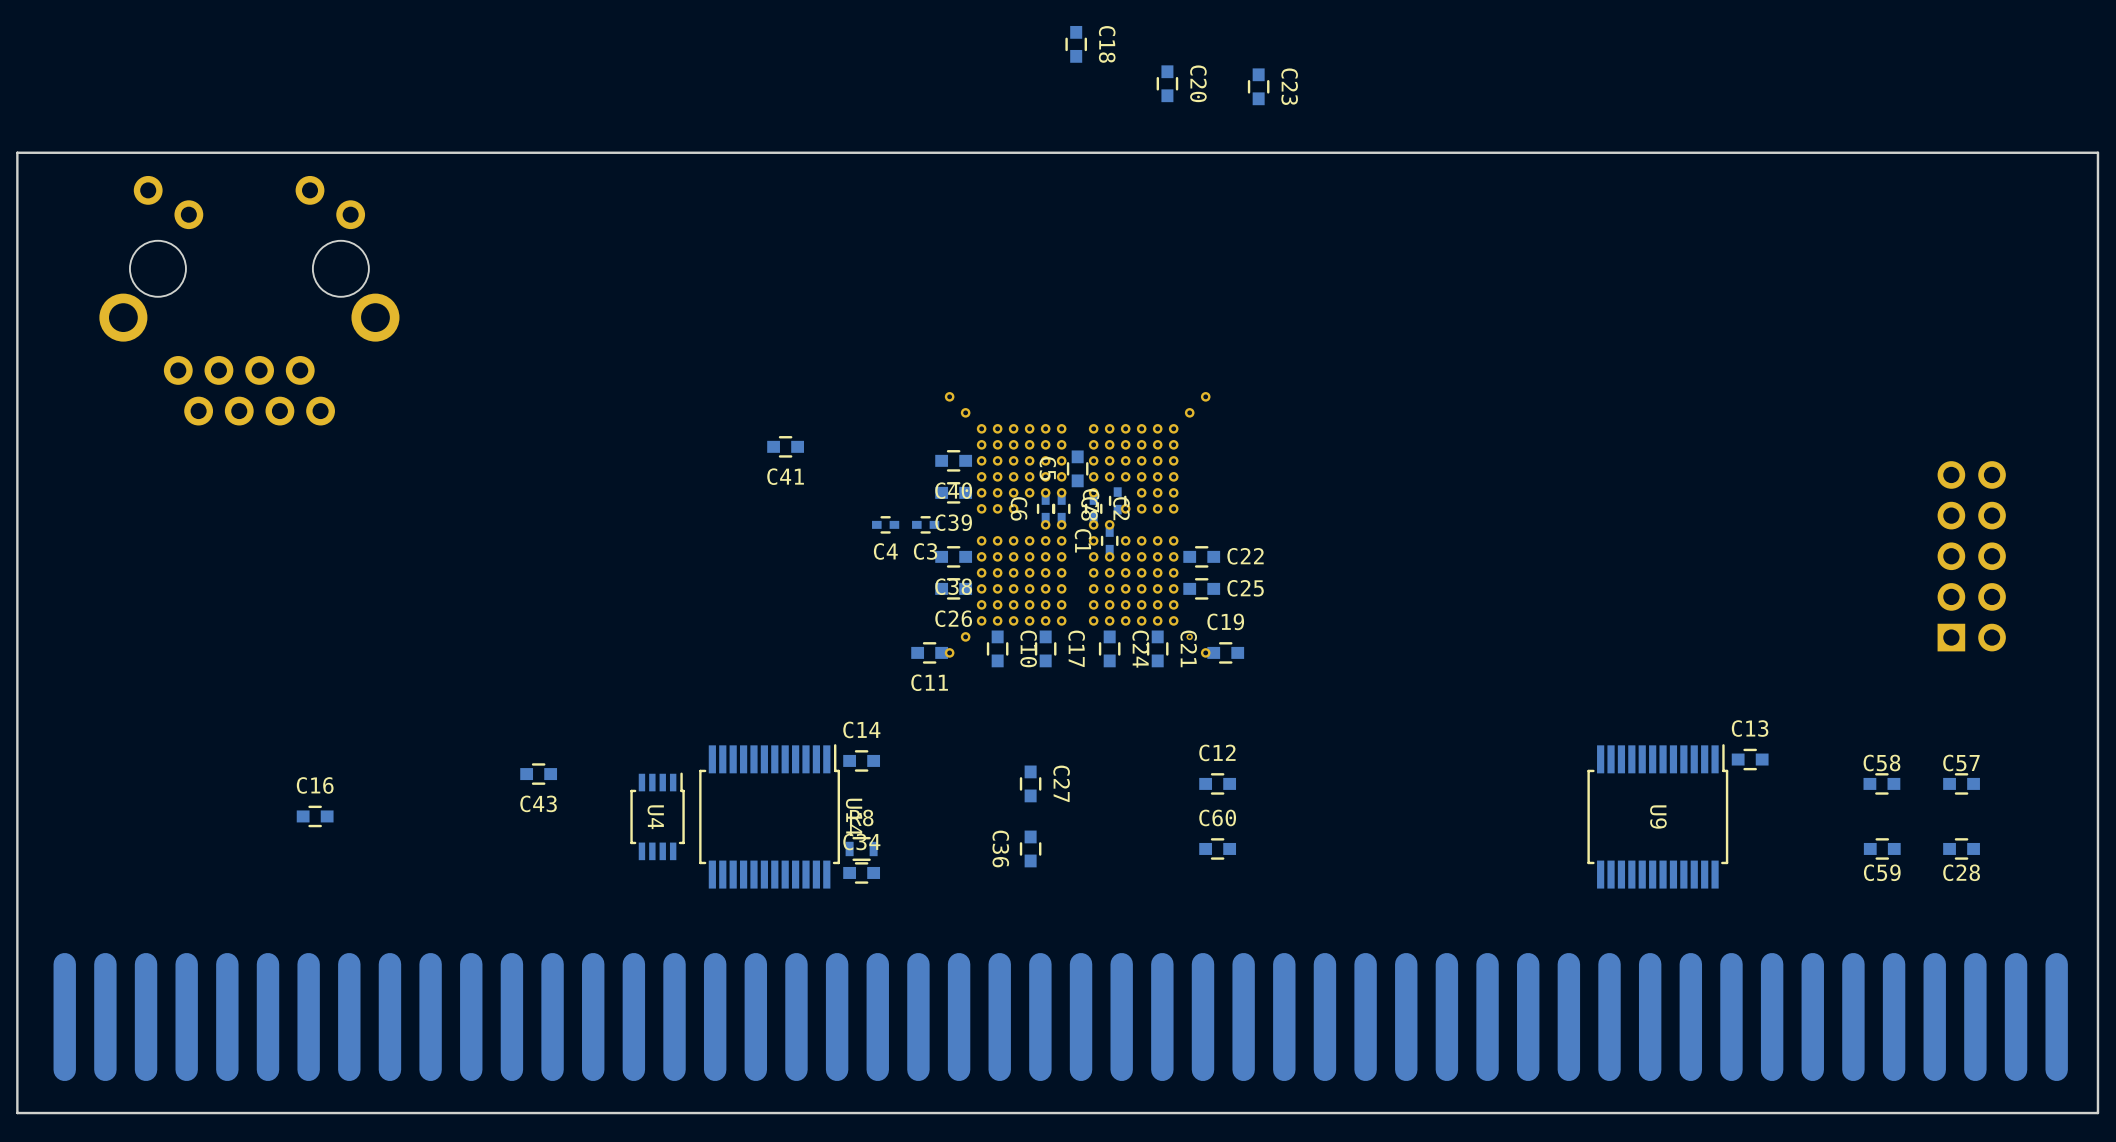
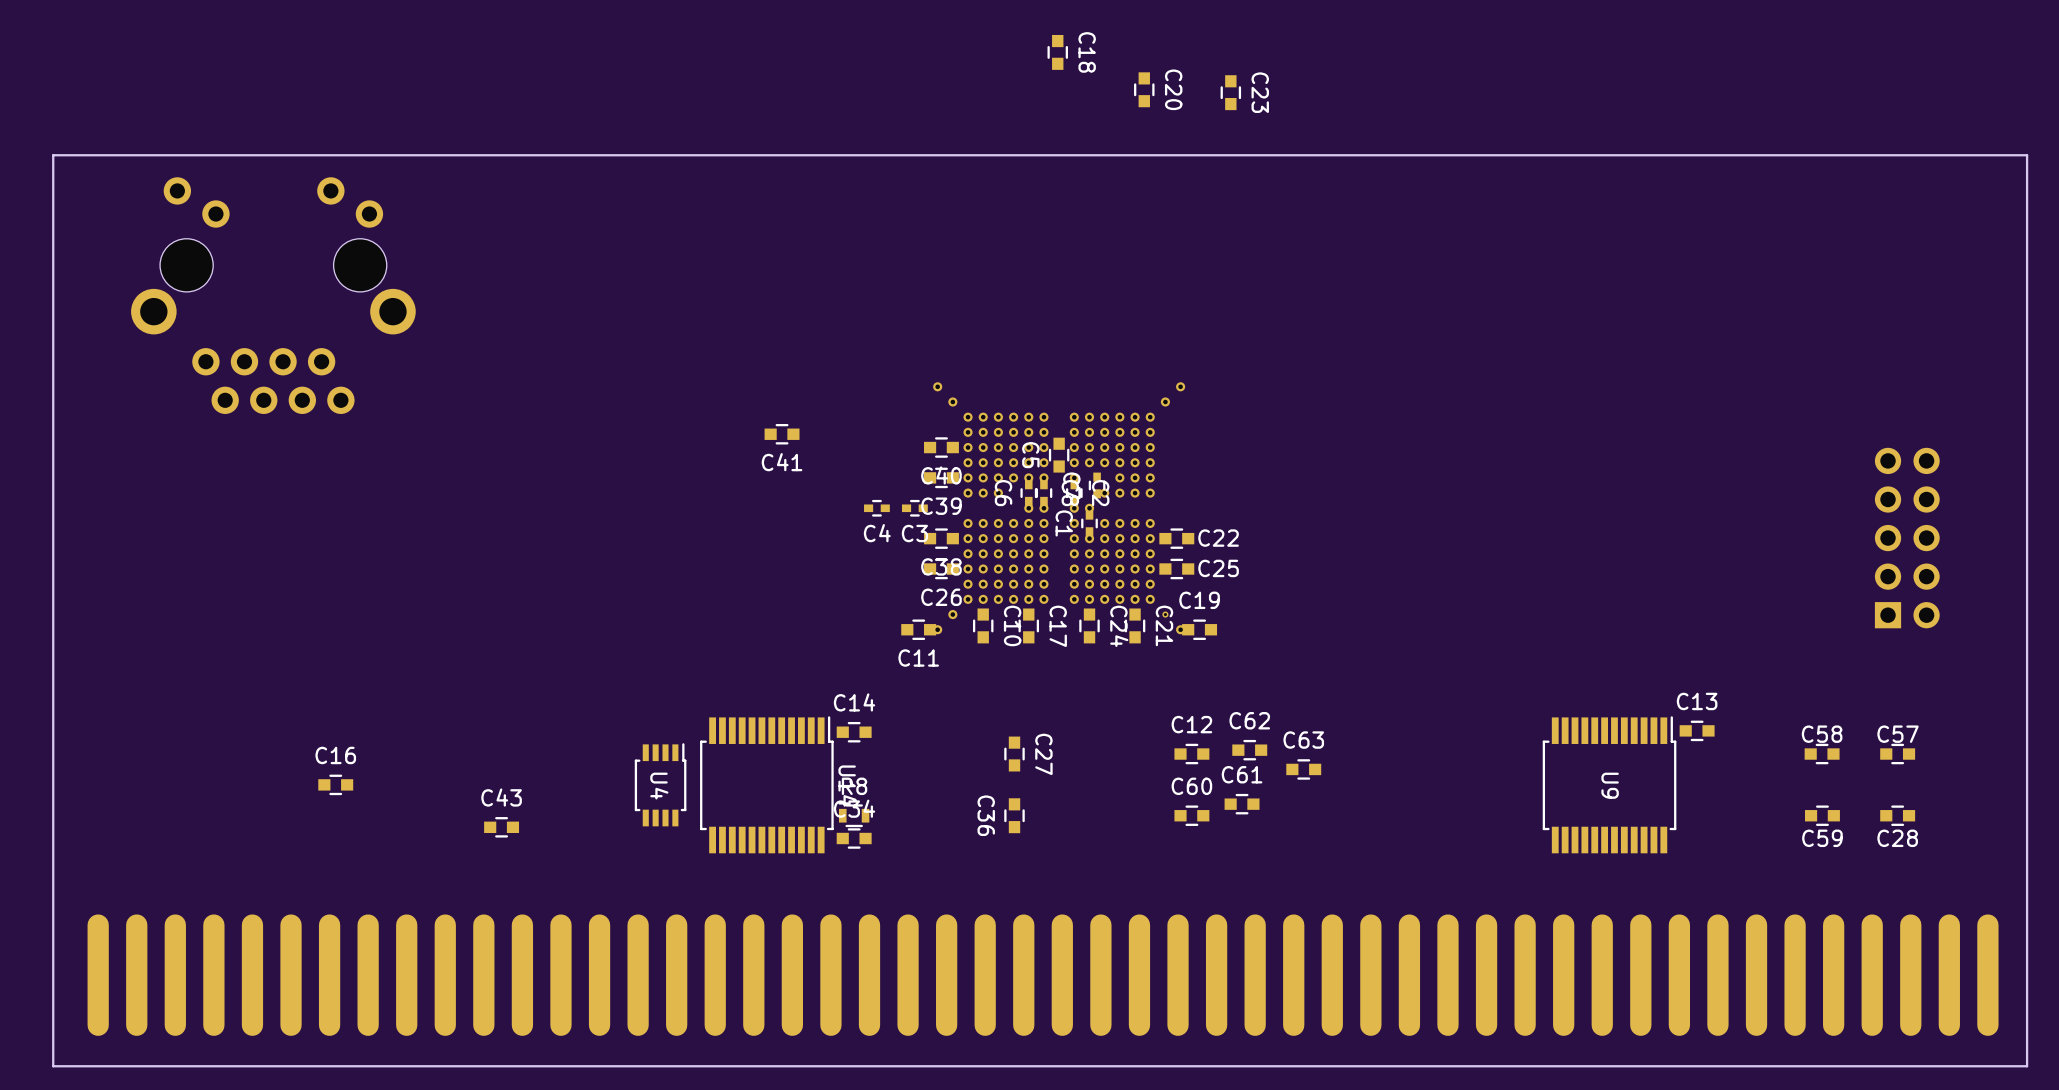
C43 position: (538, 774) -> (501, 827)
C62: none -> (1249, 750)
C63: none -> (1303, 769)
C43 name position: C43 (538, 803) -> C43 (501, 797)
C61: none -> (1242, 804)

